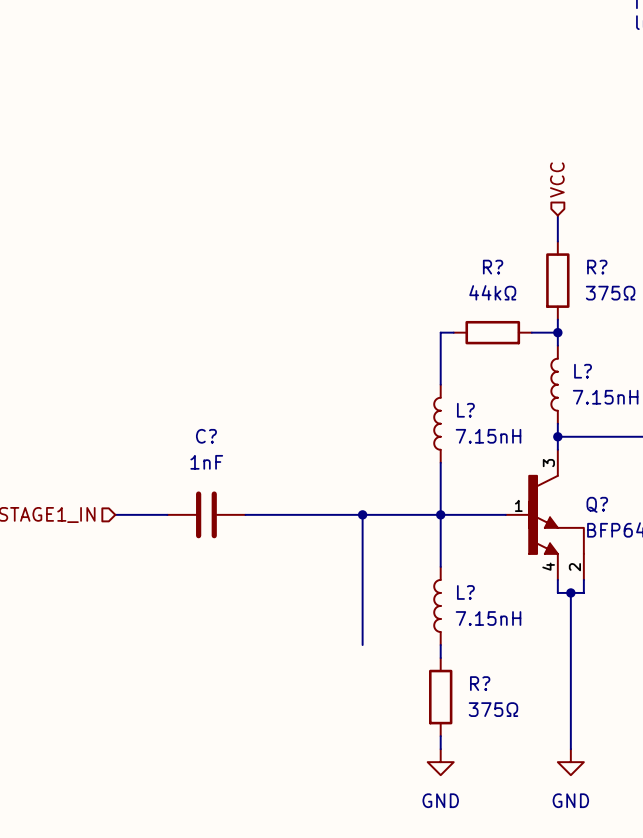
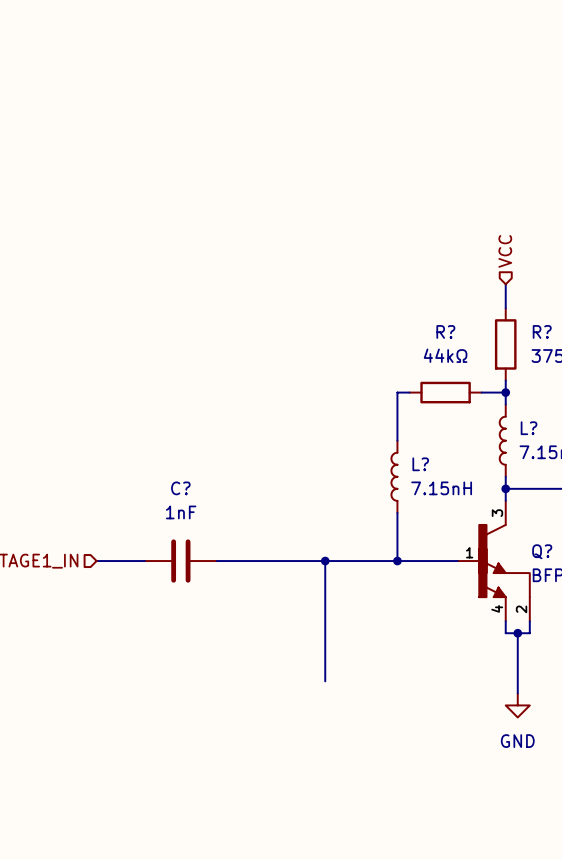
wire: (440, 514) (440, 566) -> none
L?: 7.15nH (437, 605) -> none
wire: (440, 645) (440, 658) -> none
wire: (570, 658) (570, 749) -> none
power symbol: none -> GND (517, 705)
R?: 375Ω (440, 697) -> none
wire: (440, 736) (440, 749) -> none
power symbol: GND (440, 762) -> none
power symbol: GND (570, 762) -> none

